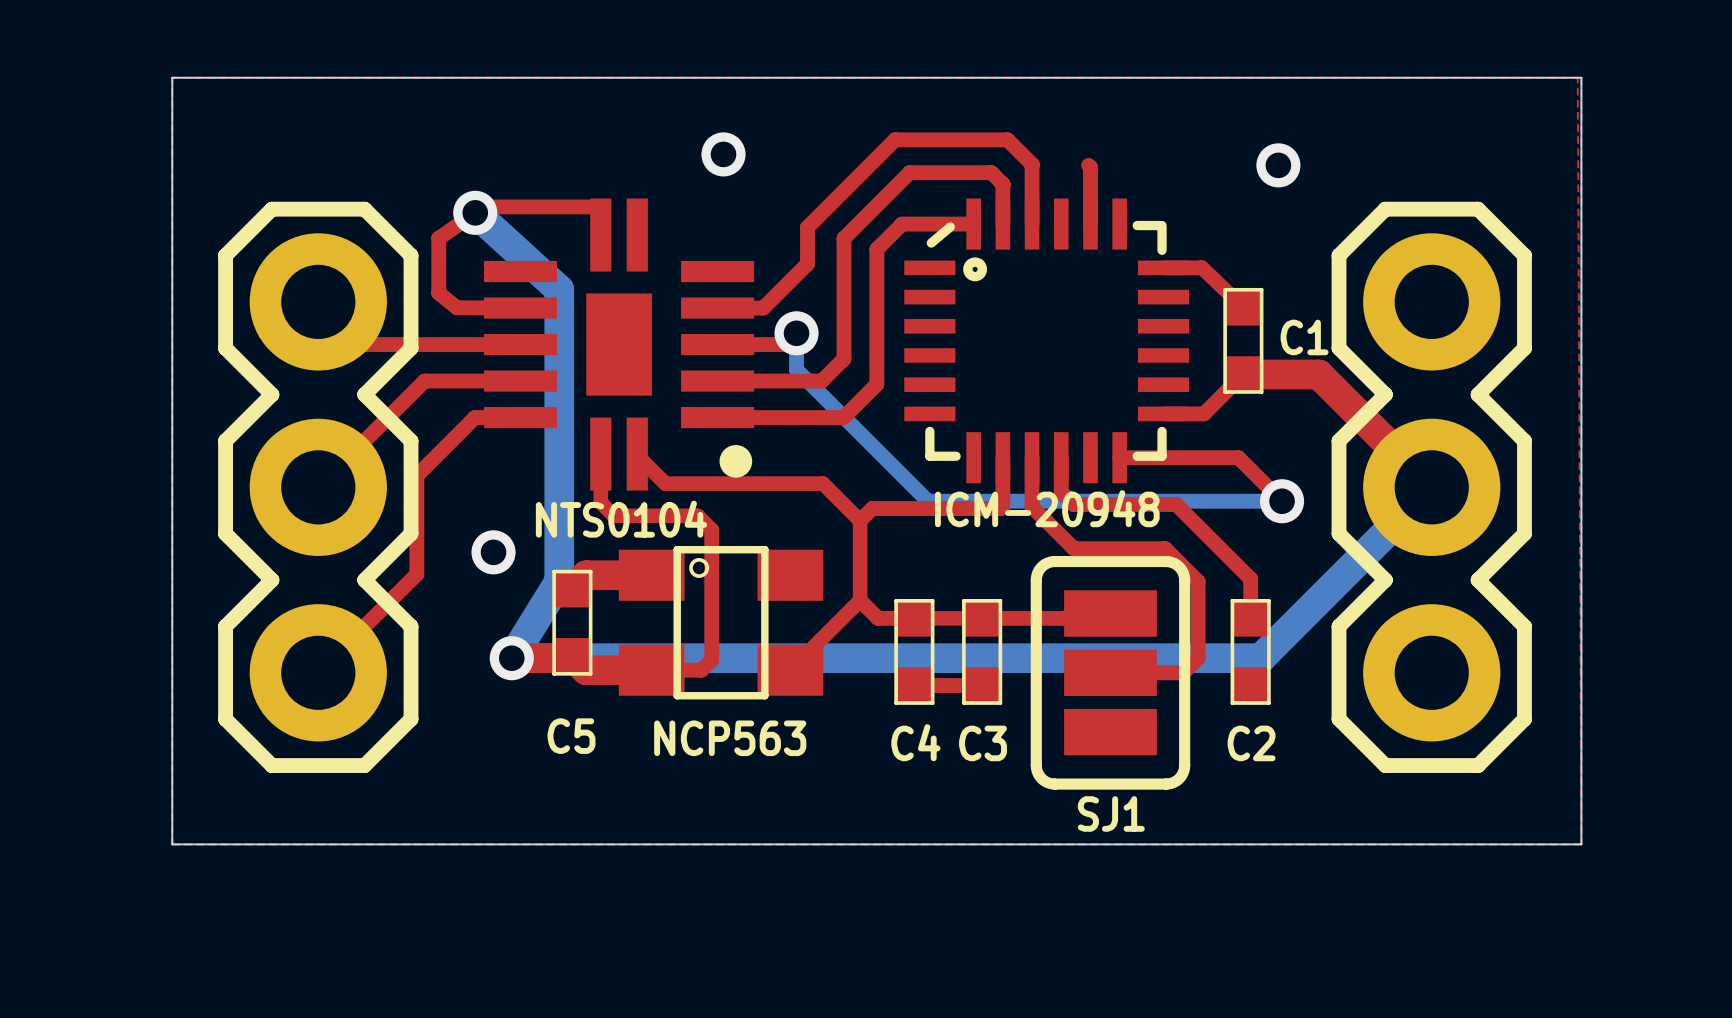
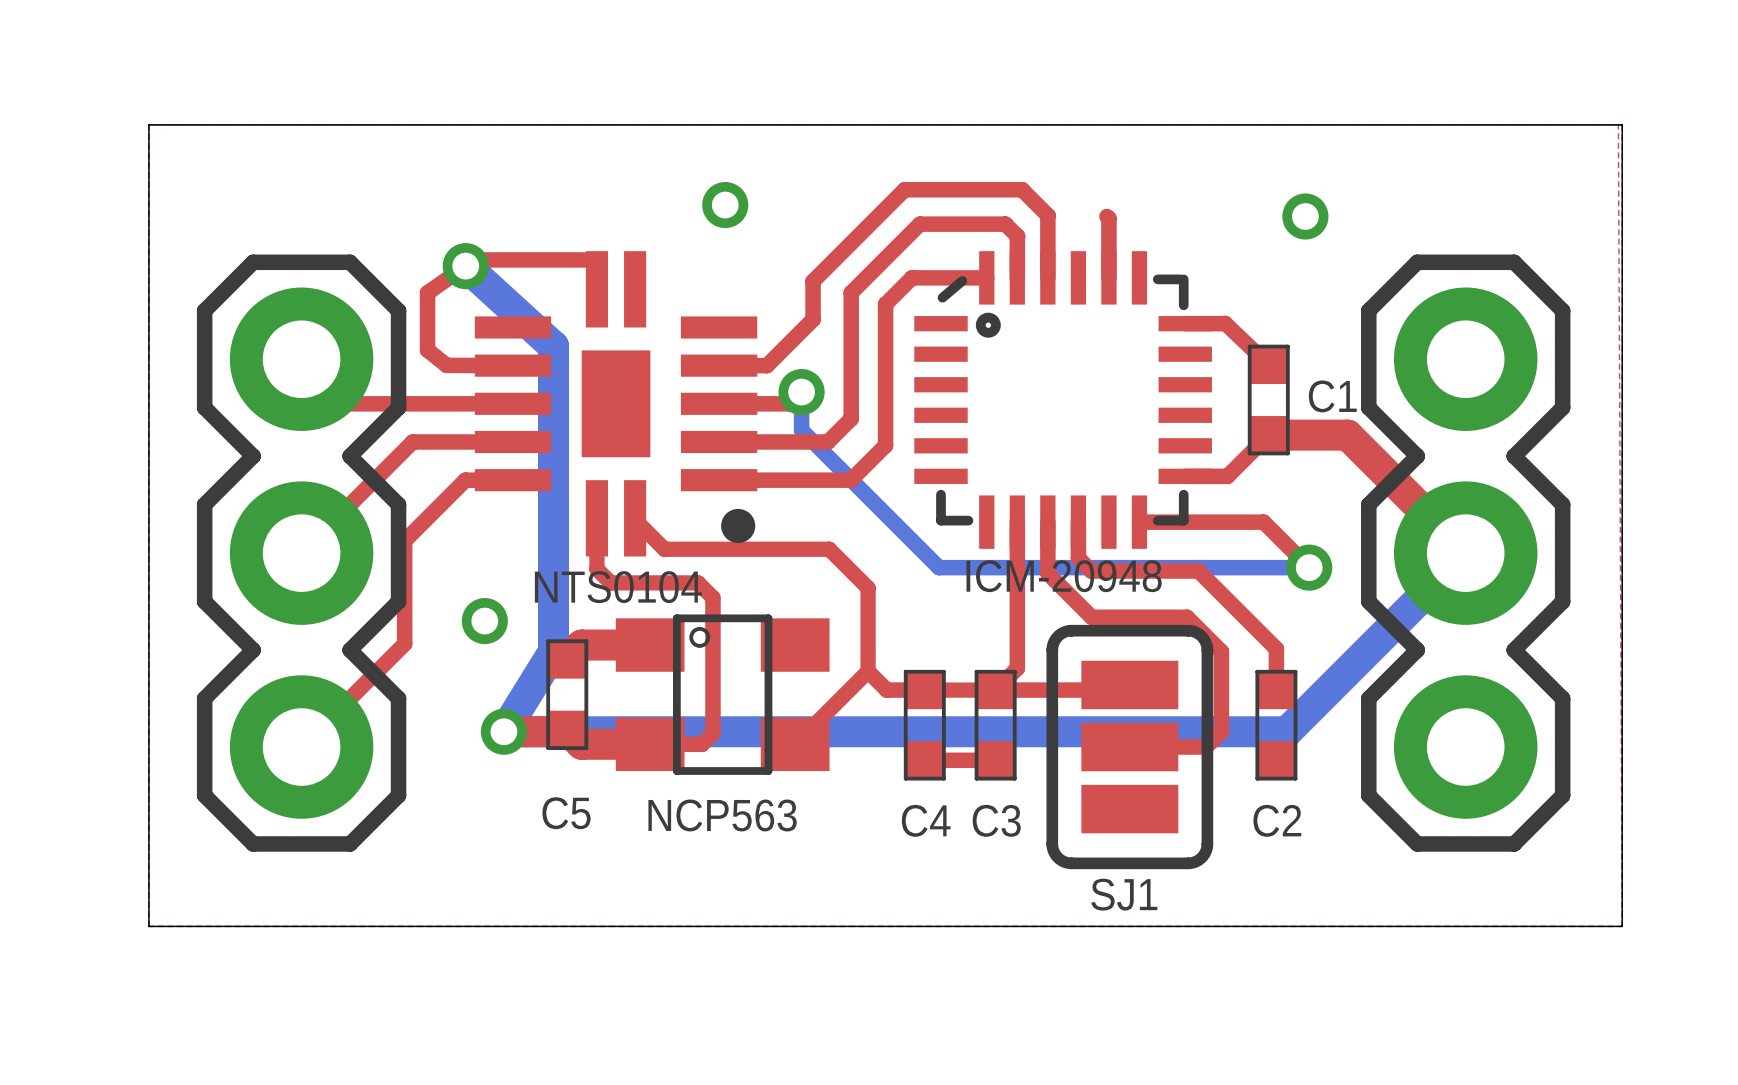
top track: (1002, 506) (1000, 508) (872, 508) (860, 520) -> (1017, 573) (1017, 668) (995, 690)

